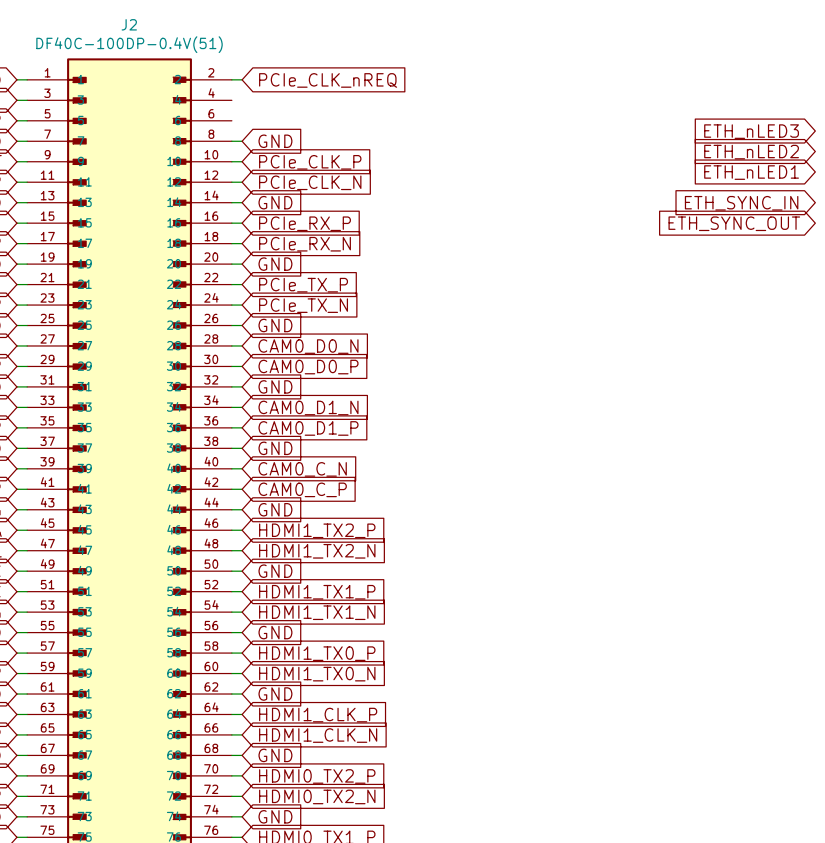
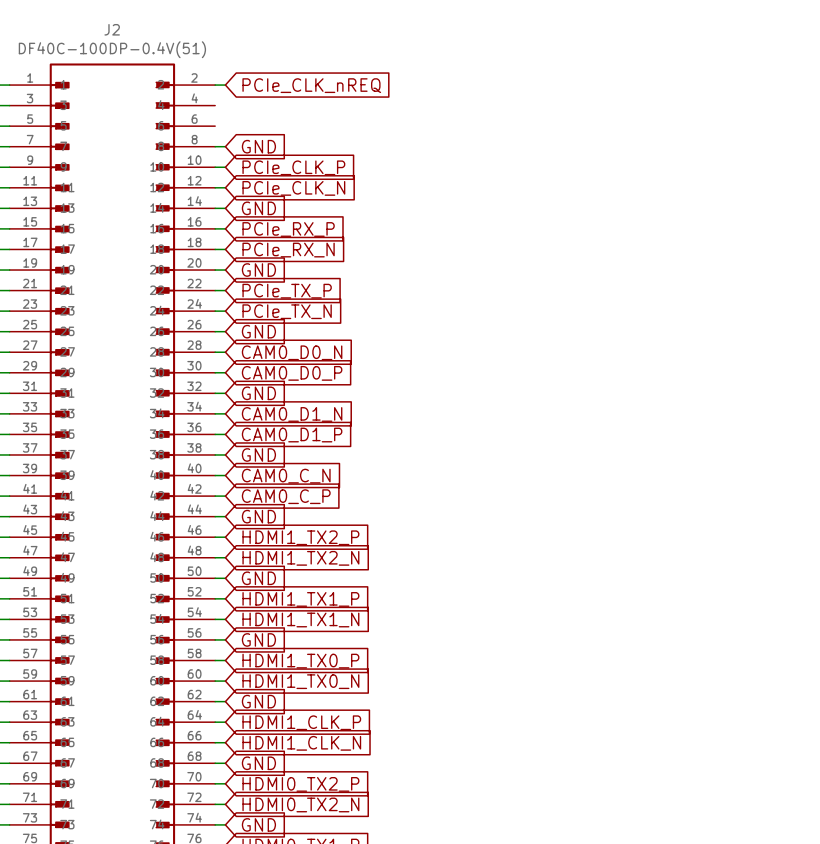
global label: ETH_nLED3 (751, 131) -> none
global label: ETH_nLED2 (751, 152) -> none
global label: ETH_nLED1 (751, 172) -> none
global label: ETH_SYNC_IN (741, 203) -> none
global label: ETH_SYNC_OUT (734, 223) -> none

